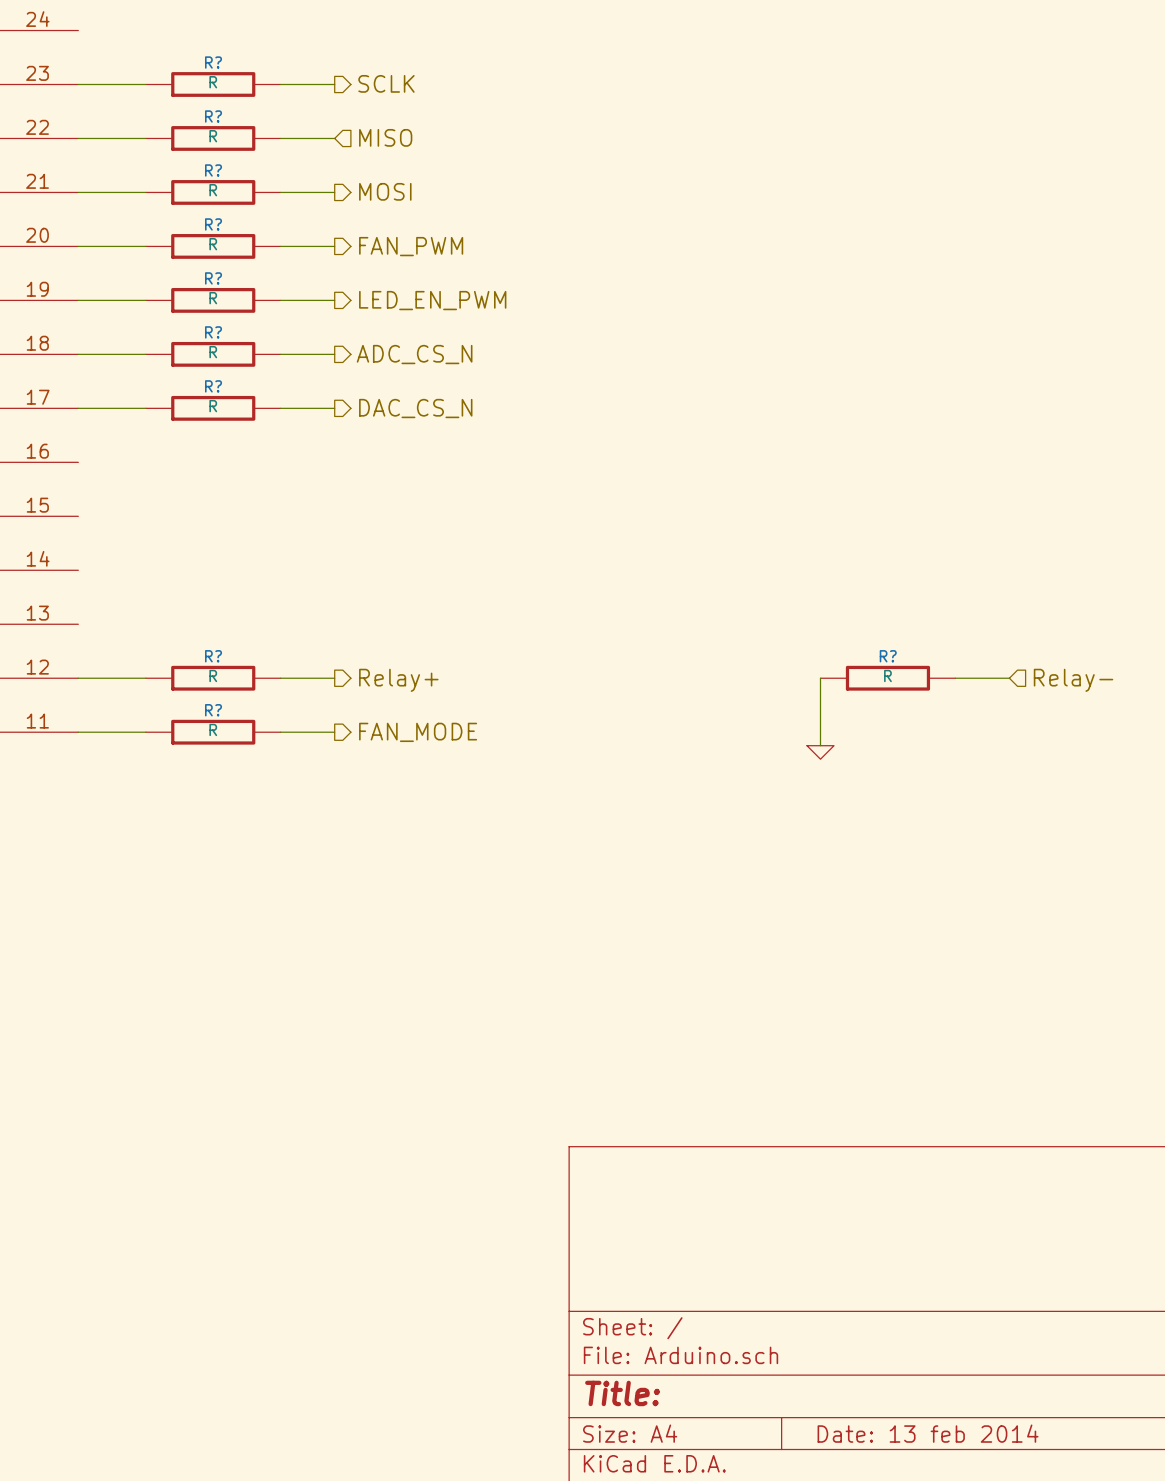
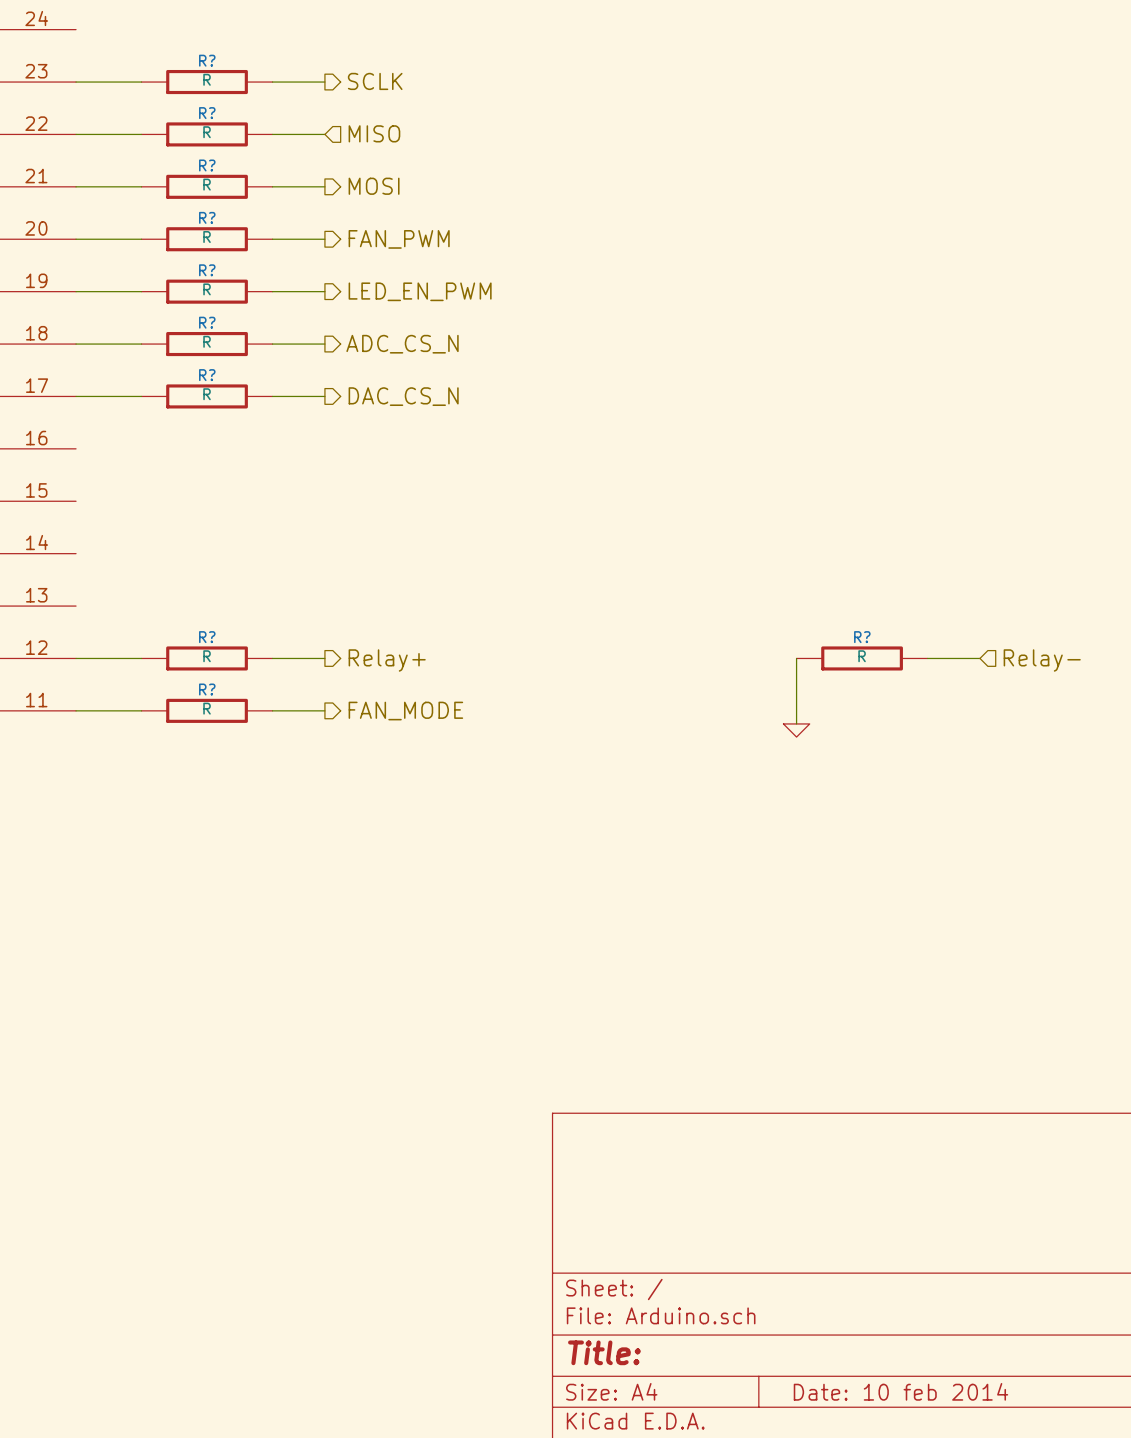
title block: Date: 13 feb 2014 (928, 1433) -> Date: 10 feb 2014 (900, 1391)

